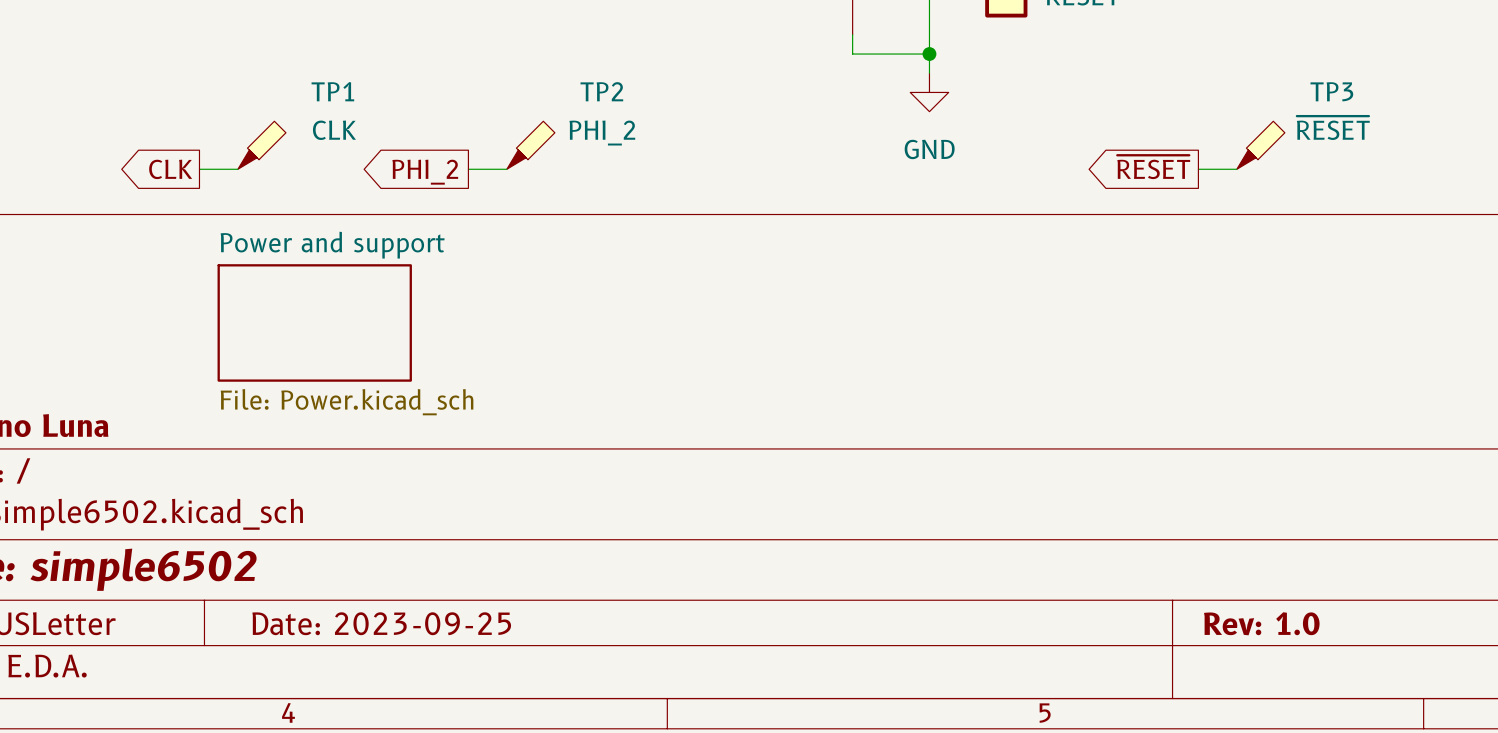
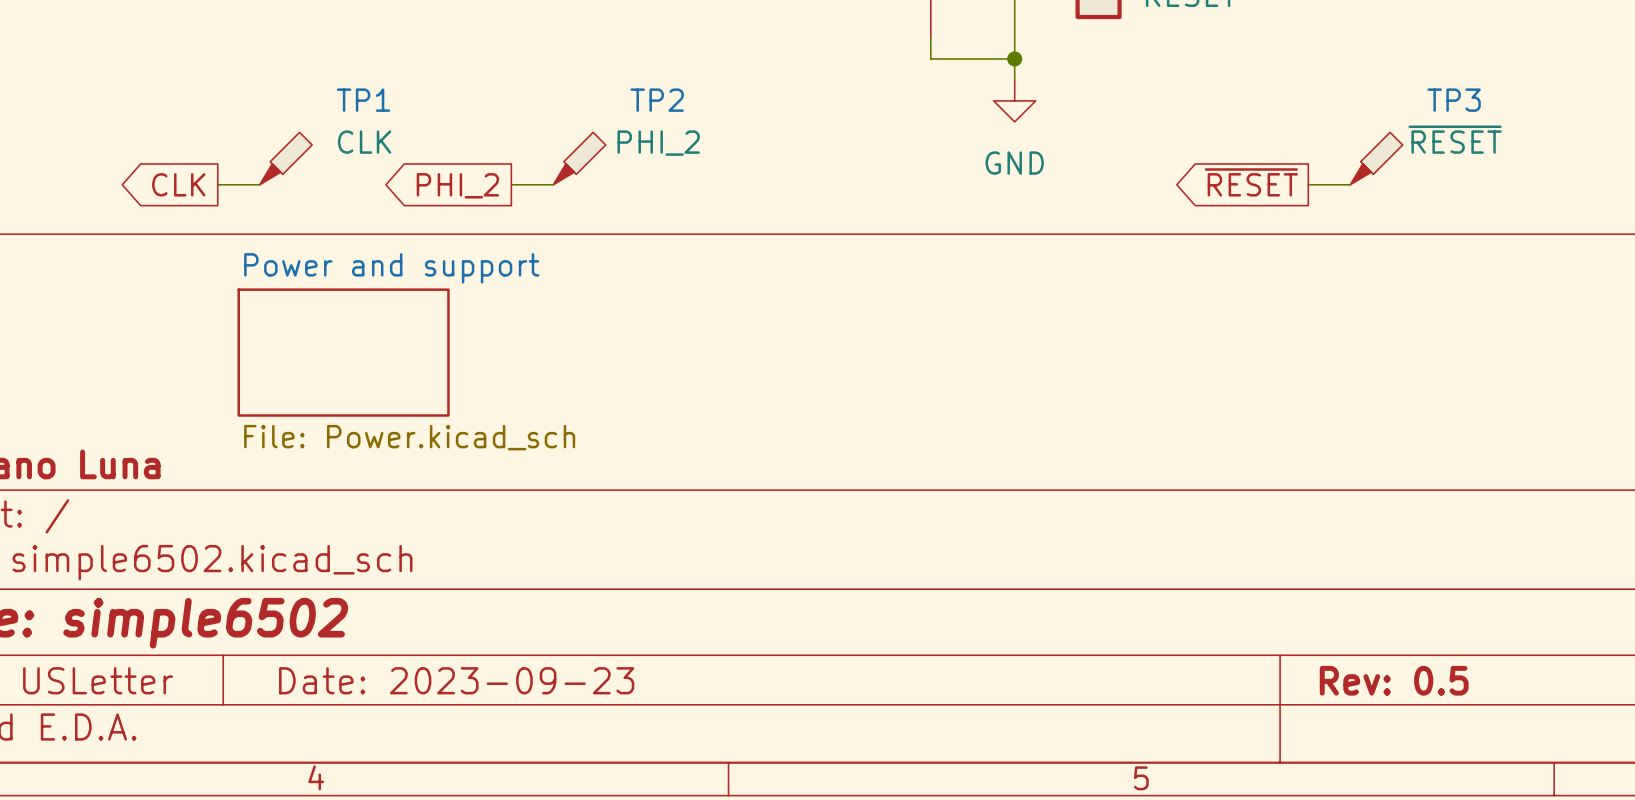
title block: Date: 2023-09-25 (381, 623) -> Date: 2023-09-23 (456, 680)
title block: Rev: 1.0 (1261, 623) -> Rev: 0.5 (1394, 680)

